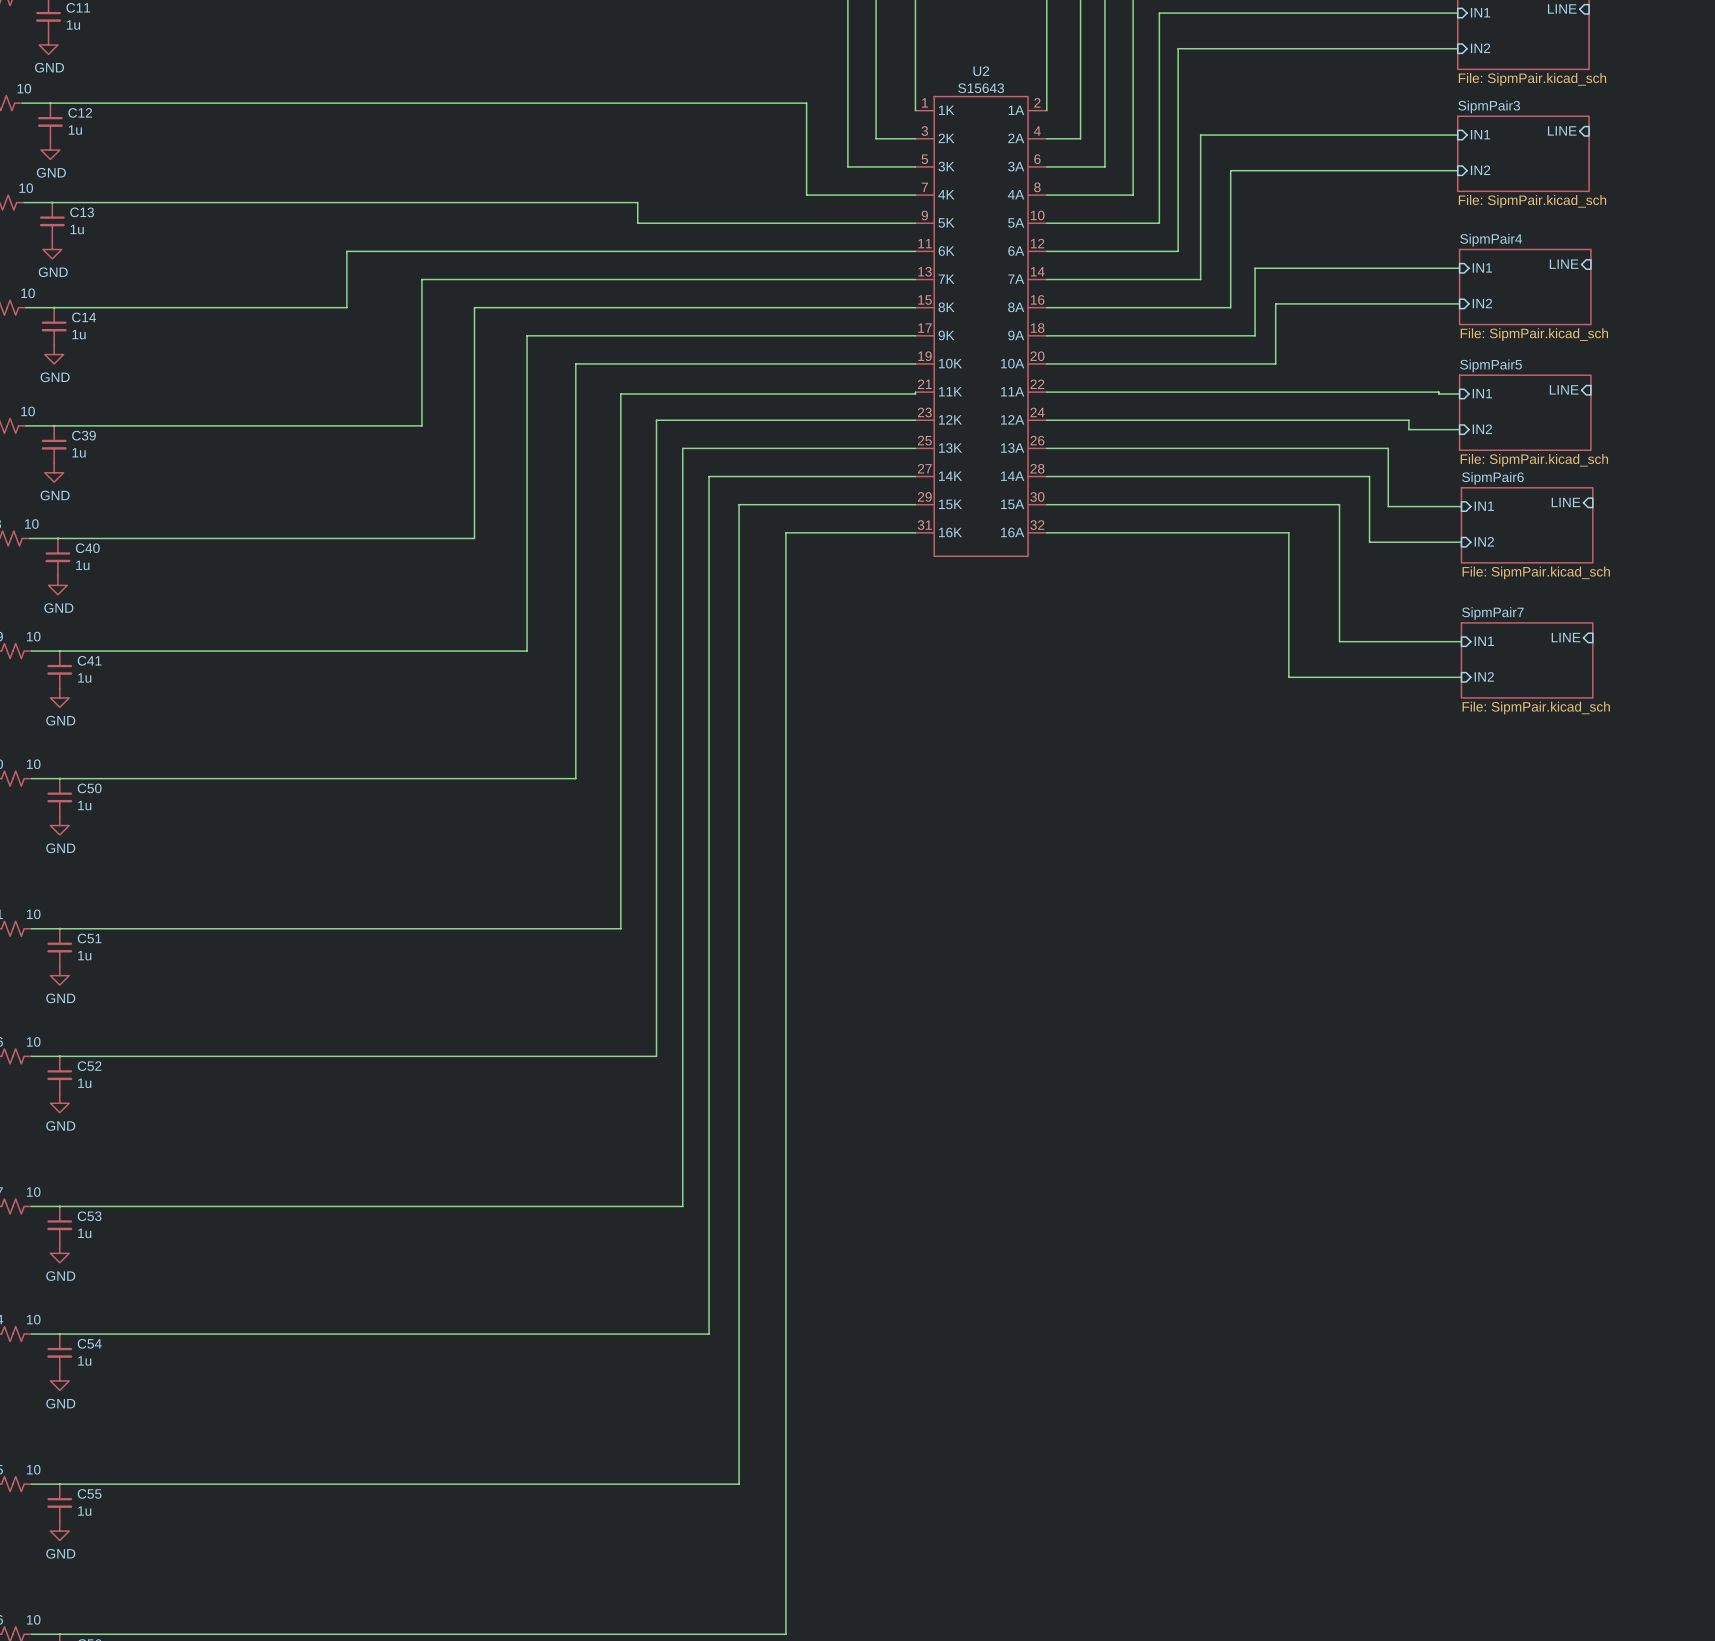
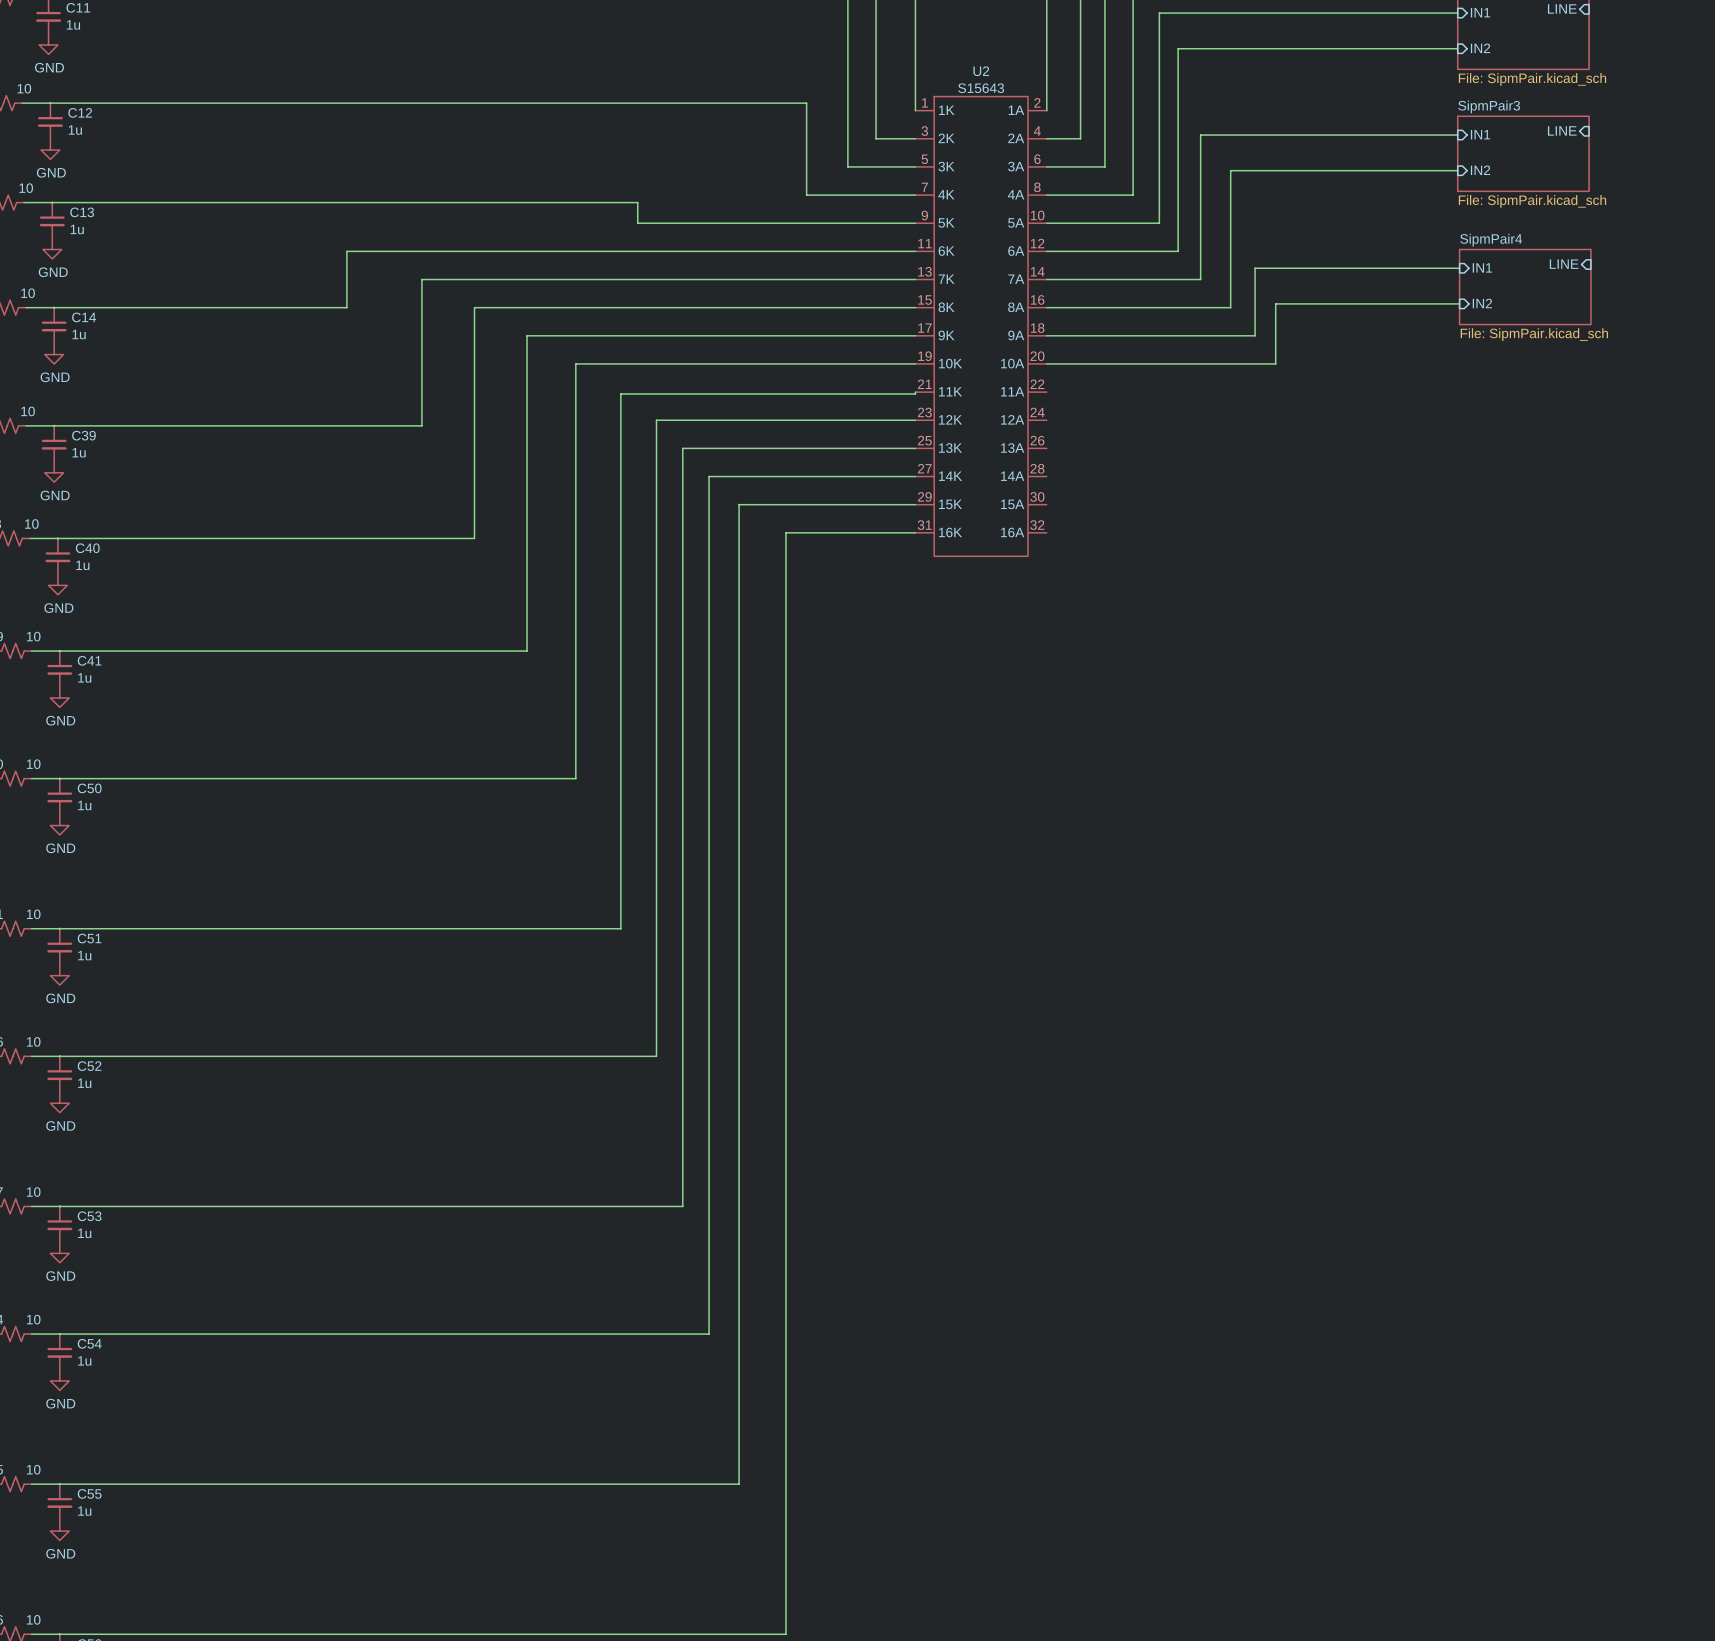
sheet pin: LINE (1564, 389) -> none
wire: (1046, 392) (1438, 392) (1438, 393) (1459, 393) -> none
sheet pin: IN1 (1482, 393) -> none
sheet SipmPair5: File: SipmPair.kicad_sch (1525, 412) -> none
wire: (1046, 420) (1408, 420) (1408, 429) (1459, 429) -> none
sheet pin: IN2 (1482, 429) -> none
wire: (1046, 448) (1388, 448) (1388, 506) (1461, 506) -> none
wire: (1046, 476) (1369, 476) (1369, 542) (1461, 542) -> none
sheet pin: LINE (1566, 502) -> none
wire: (1046, 504) (1339, 504) (1339, 641) (1461, 641) -> none
sheet pin: IN1 (1484, 506) -> none
sheet SipmPair6: File: SipmPair.kicad_sch (1527, 525) -> none
wire: (1046, 532) (1288, 532) (1288, 677) (1461, 677) -> none
sheet pin: IN2 (1484, 541) -> none
sheet pin: LINE (1566, 637) -> none
sheet pin: IN1 (1484, 641) -> none
sheet SipmPair7: File: SipmPair.kicad_sch (1527, 660) -> none
sheet pin: IN2 (1484, 676) -> none

